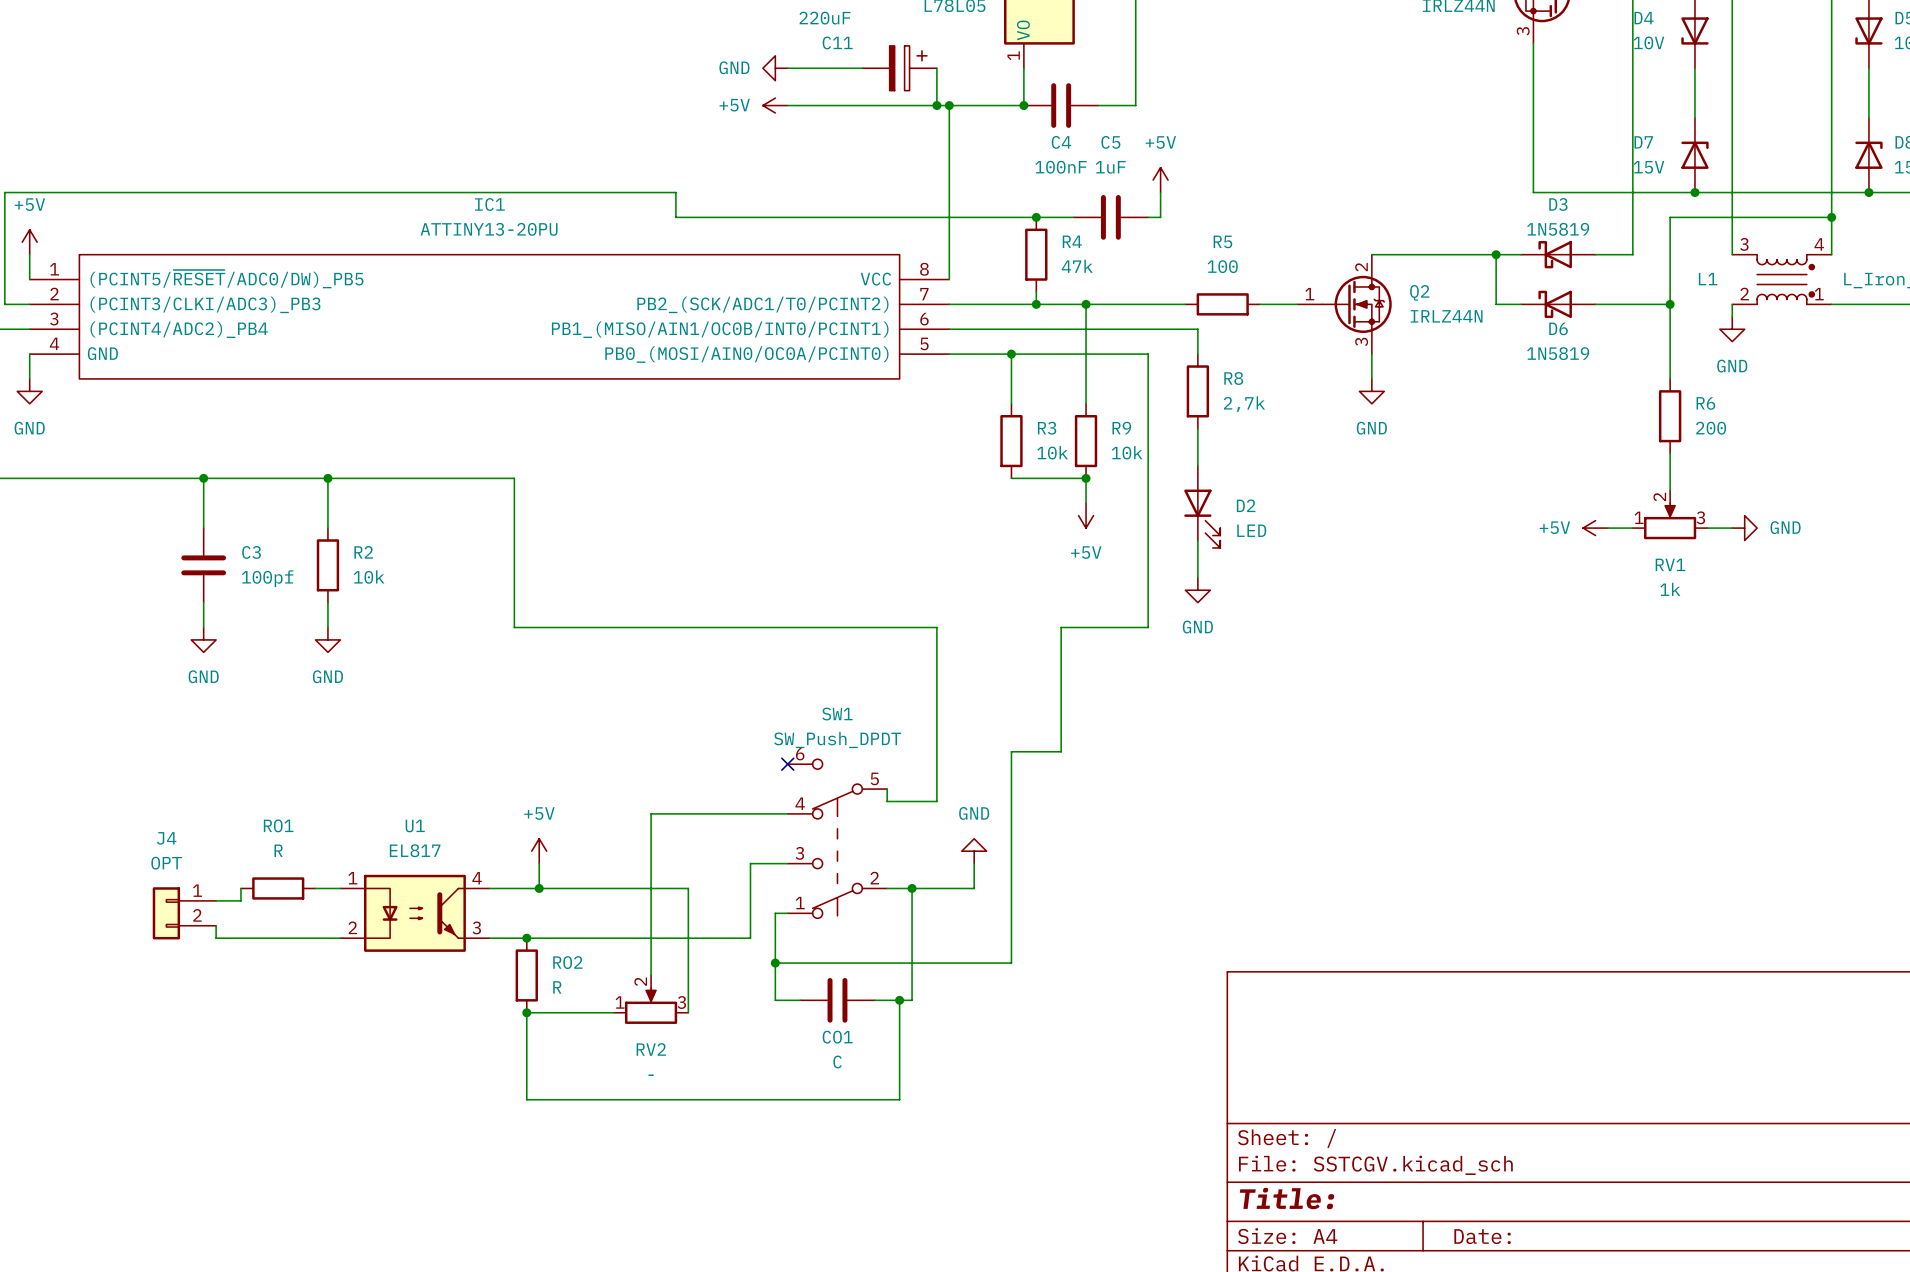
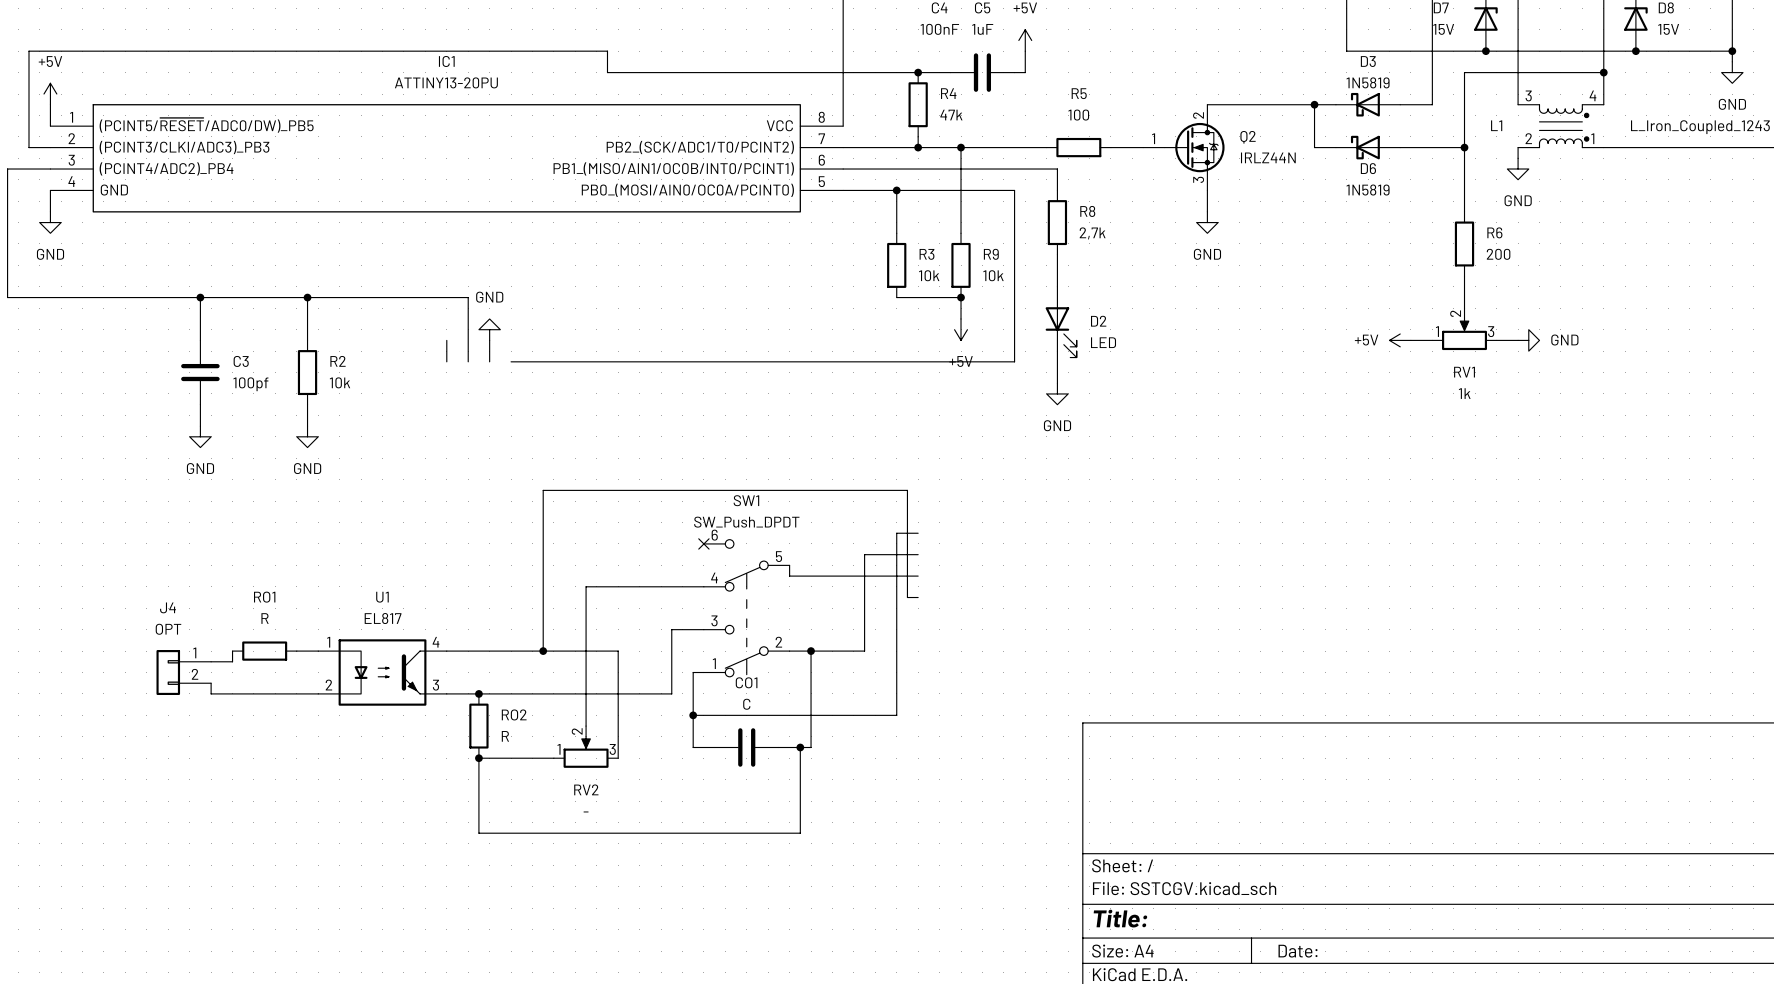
power symbol: none -> GND (489, 329)
wire: none -> (446, 340) (446, 361)
wire: none -> (489, 340) (489, 361)
wire: (514, 552) (514, 627) (936, 627) (936, 801) -> (918, 576) (832, 576)
wire: (1148, 552) (1148, 627) (1061, 627) (1061, 751) (1036, 751) -> (1014, 361) (511, 361)
wire: none -> (918, 554) (864, 554) (864, 629)
wire: none -> (918, 597) (907, 597) (907, 490) (543, 490) (543, 651)
power symbol: +5V (539, 851) -> none
power symbol: GND (974, 851) -> none
wire: (539, 863) (539, 888) -> none
junction: (539, 888) -> none
junction: none -> (543, 651)
CO1 name position: CO1 (837, 1037) -> CO1 (746, 682)
CO1 value position: C (837, 1062) -> C (746, 704)

